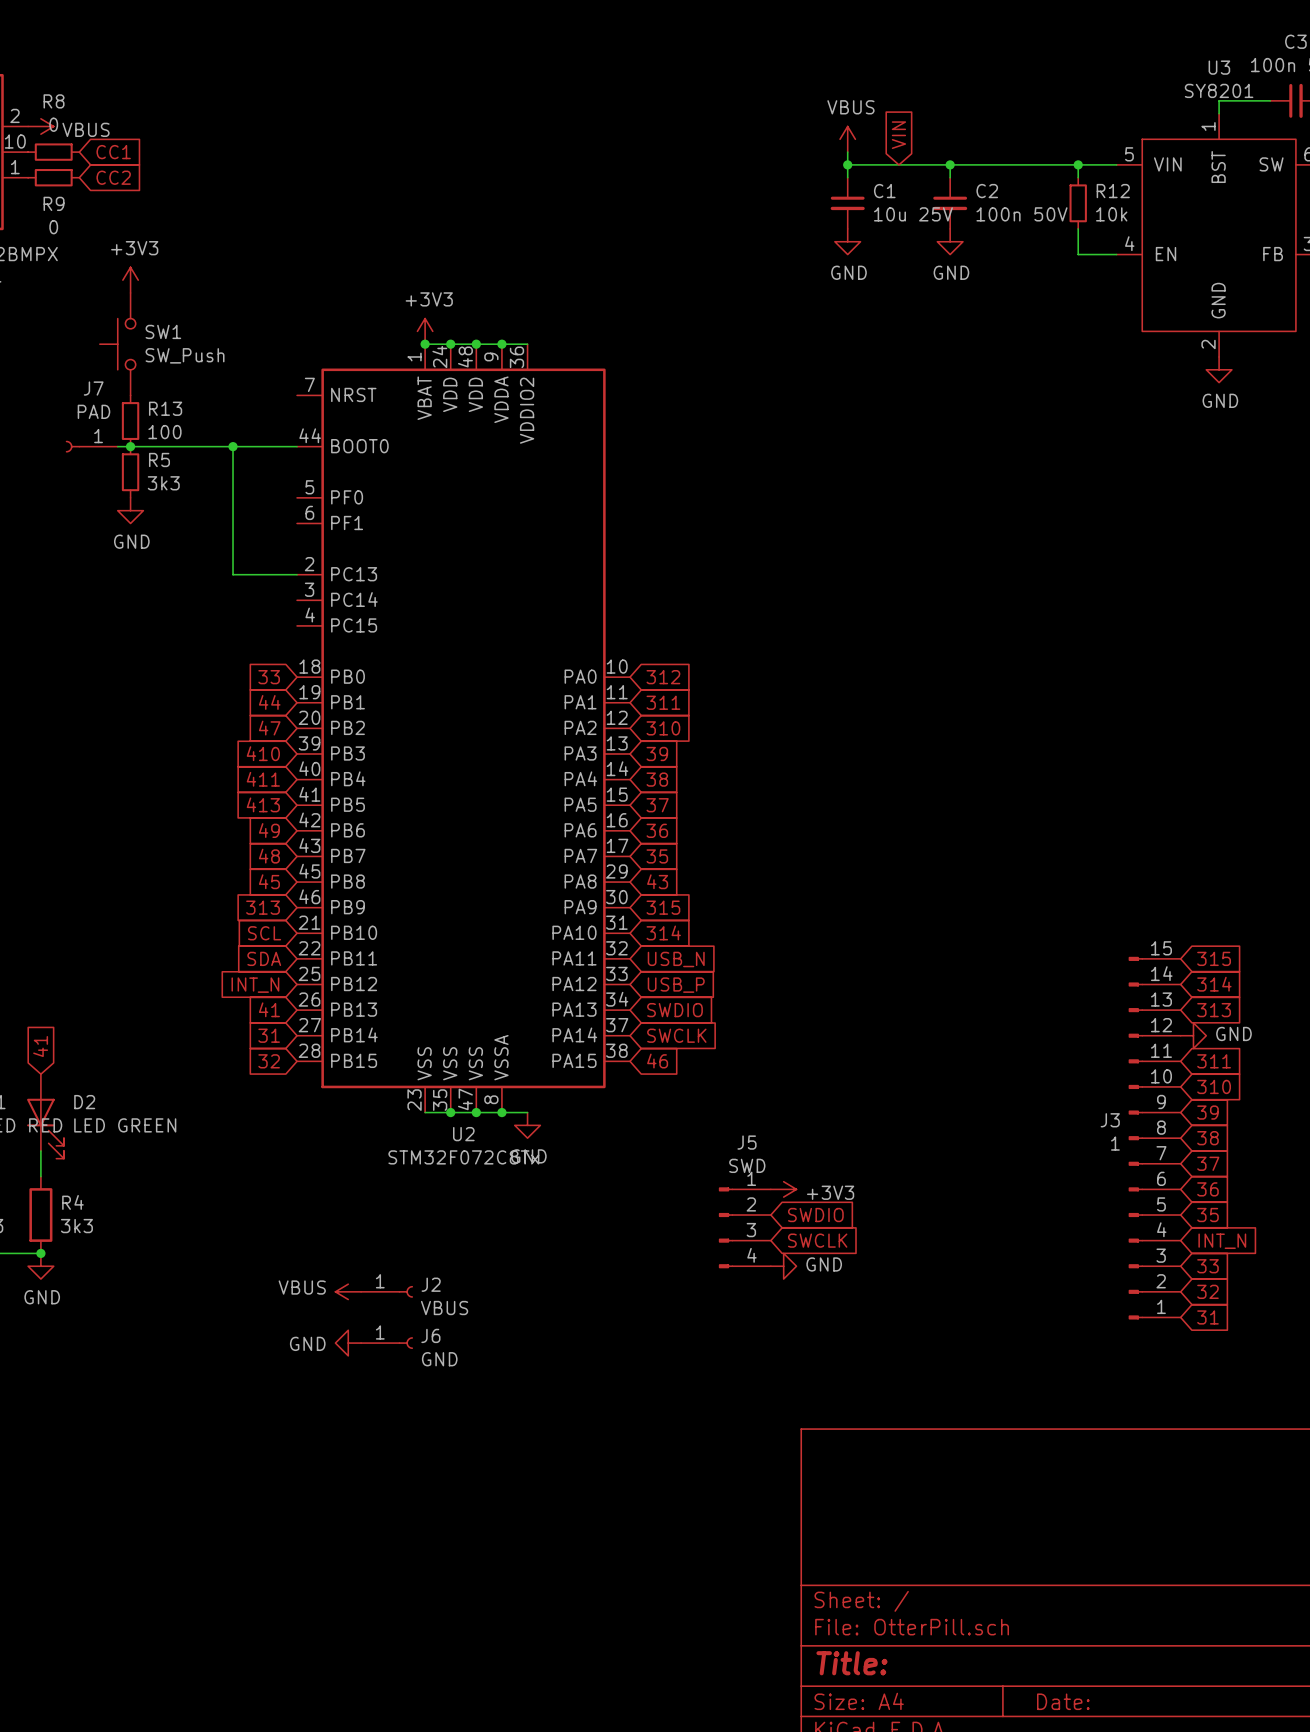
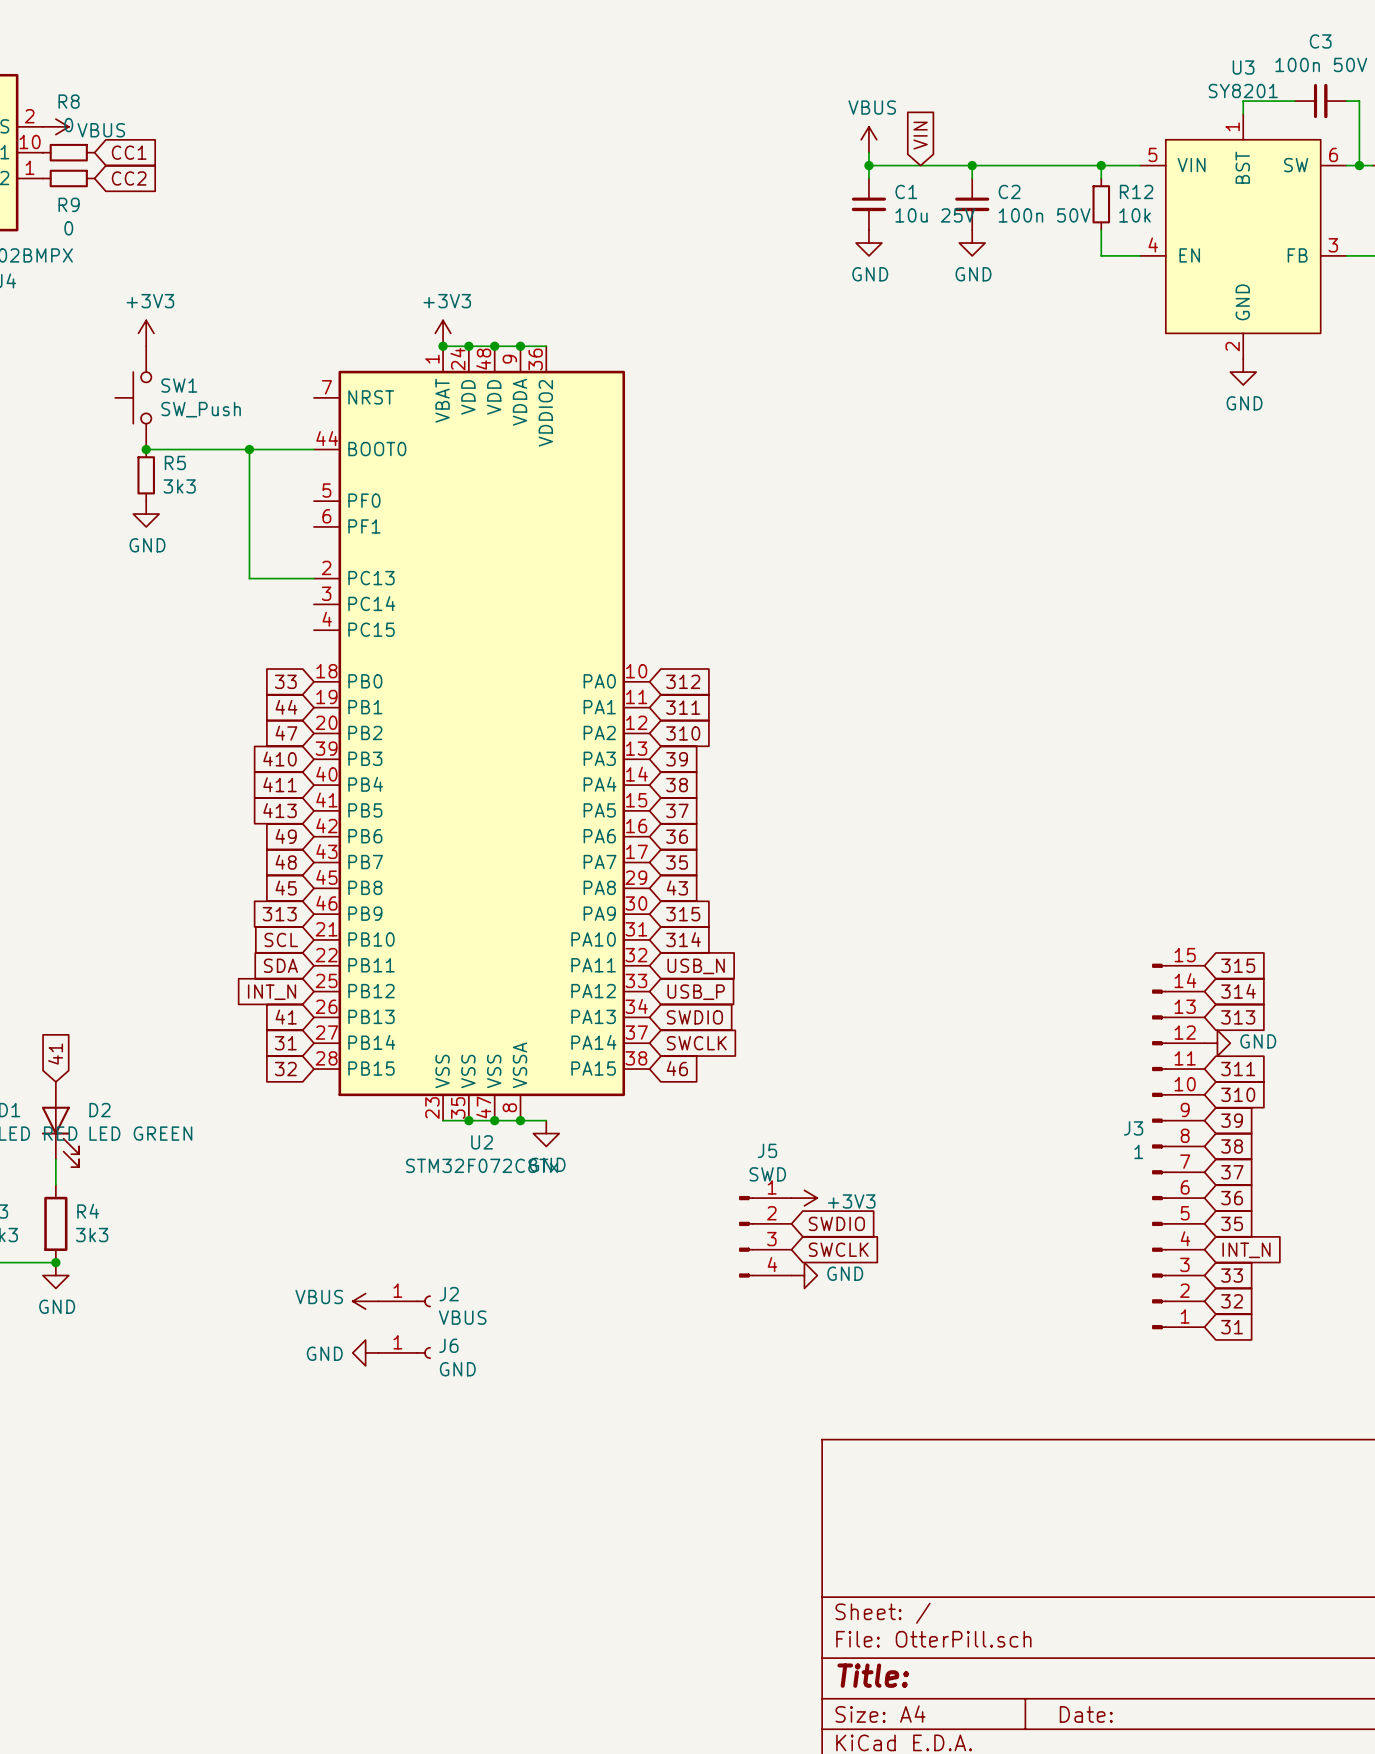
power symbol position: +3V3 (130, 280) -> +3V3 (146, 333)
SW1 position: (117, 344) -> (133, 397)
R13: 100 (130, 421) -> none
J7: PAD (91, 446) -> none
wire: (117, 446) (130, 446) -> none

